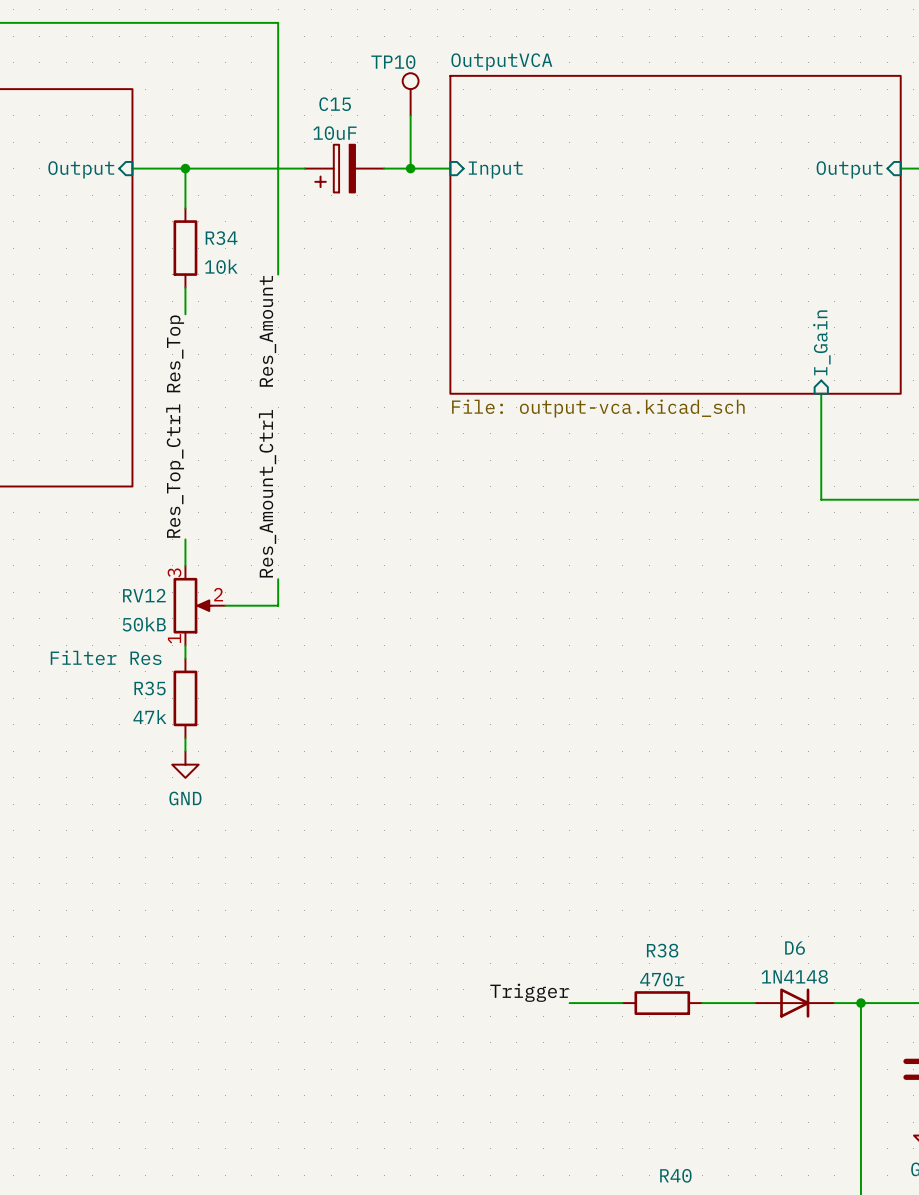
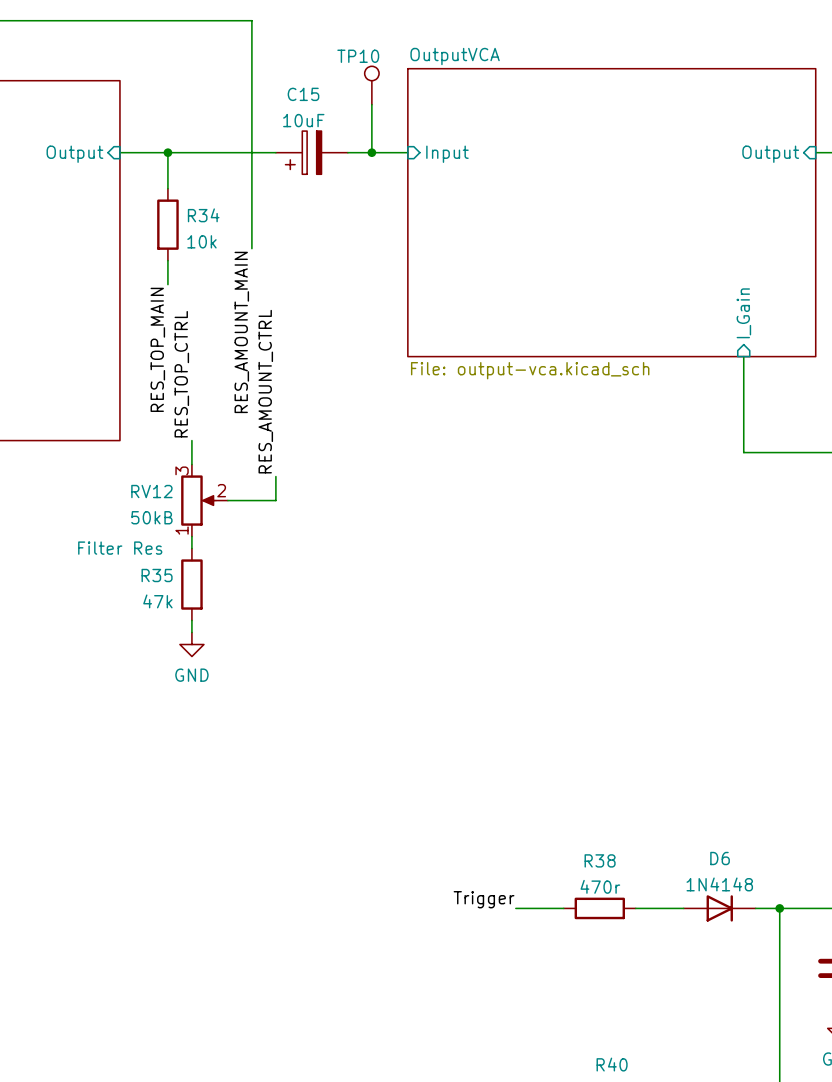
label: Res_Amount (267, 331) -> RES_AMOUNT_MAIN (241, 332)
label: Res_Top (175, 353) -> RES_TOP_MAIN (157, 349)
label: none -> RES_TOP_CTRL (181, 374)
label: none -> RES_AMOUNT_CTRL (265, 391)
label: Res_Top_Ctrl (175, 471) -> none
label: Res_Amount_Ctrl (267, 493) -> none
wire: (185, 539) (185, 565) -> (191, 440) (191, 464)
wire: (278, 579) (278, 605) (225, 605) -> (275, 476) (275, 500) (227, 500)
RV12 position: (199, 605) -> (204, 500)
wire: (185, 645) (185, 658) -> (191, 536) (191, 548)
R35 position: (185, 698) -> (191, 584)
wire: (185, 738) (185, 751) -> (191, 620) (191, 632)
power symbol position: GND (185, 764) -> GND (191, 644)

